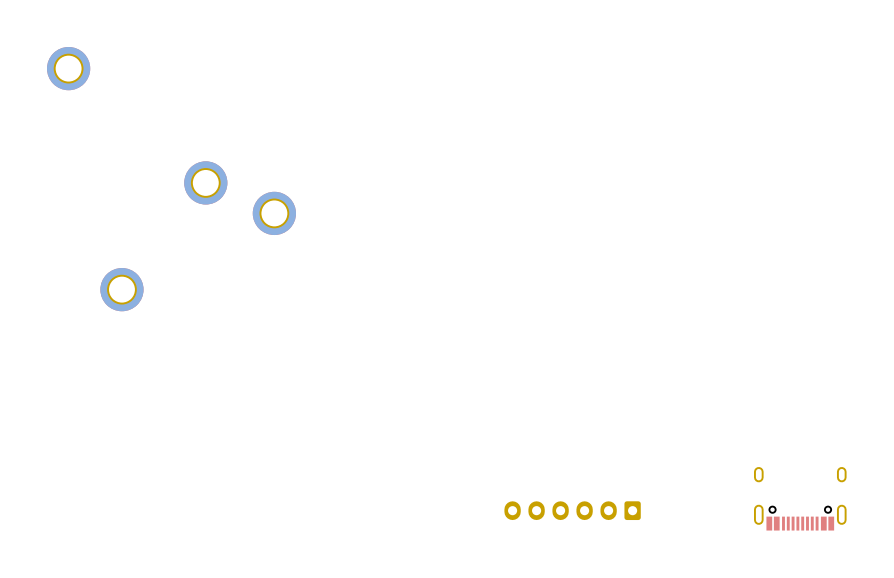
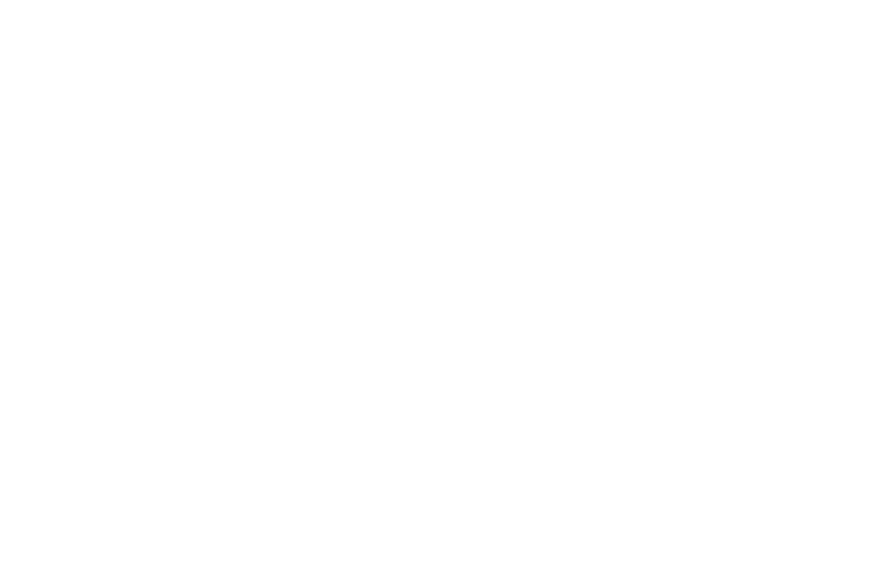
part: (68, 68) -> none
part: (205, 182) -> none
part: (274, 213) -> none
part: (121, 289) -> none
part: (800, 498) -> none
part: (572, 510) -> none

